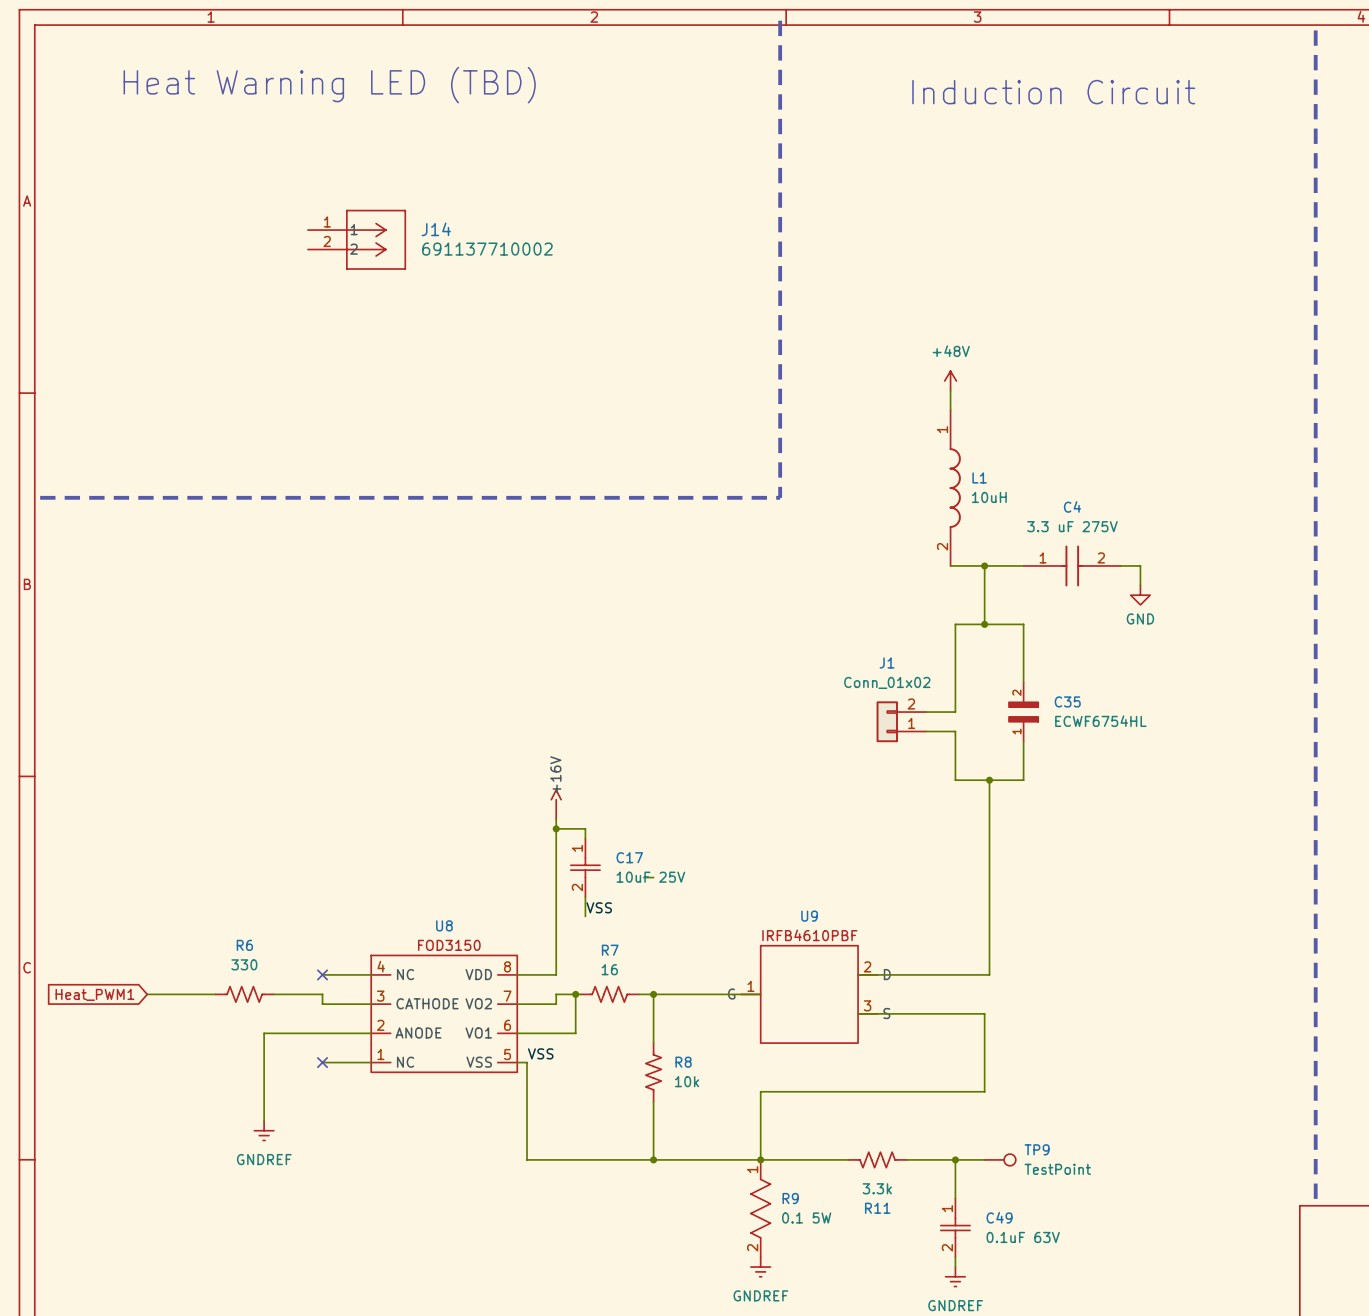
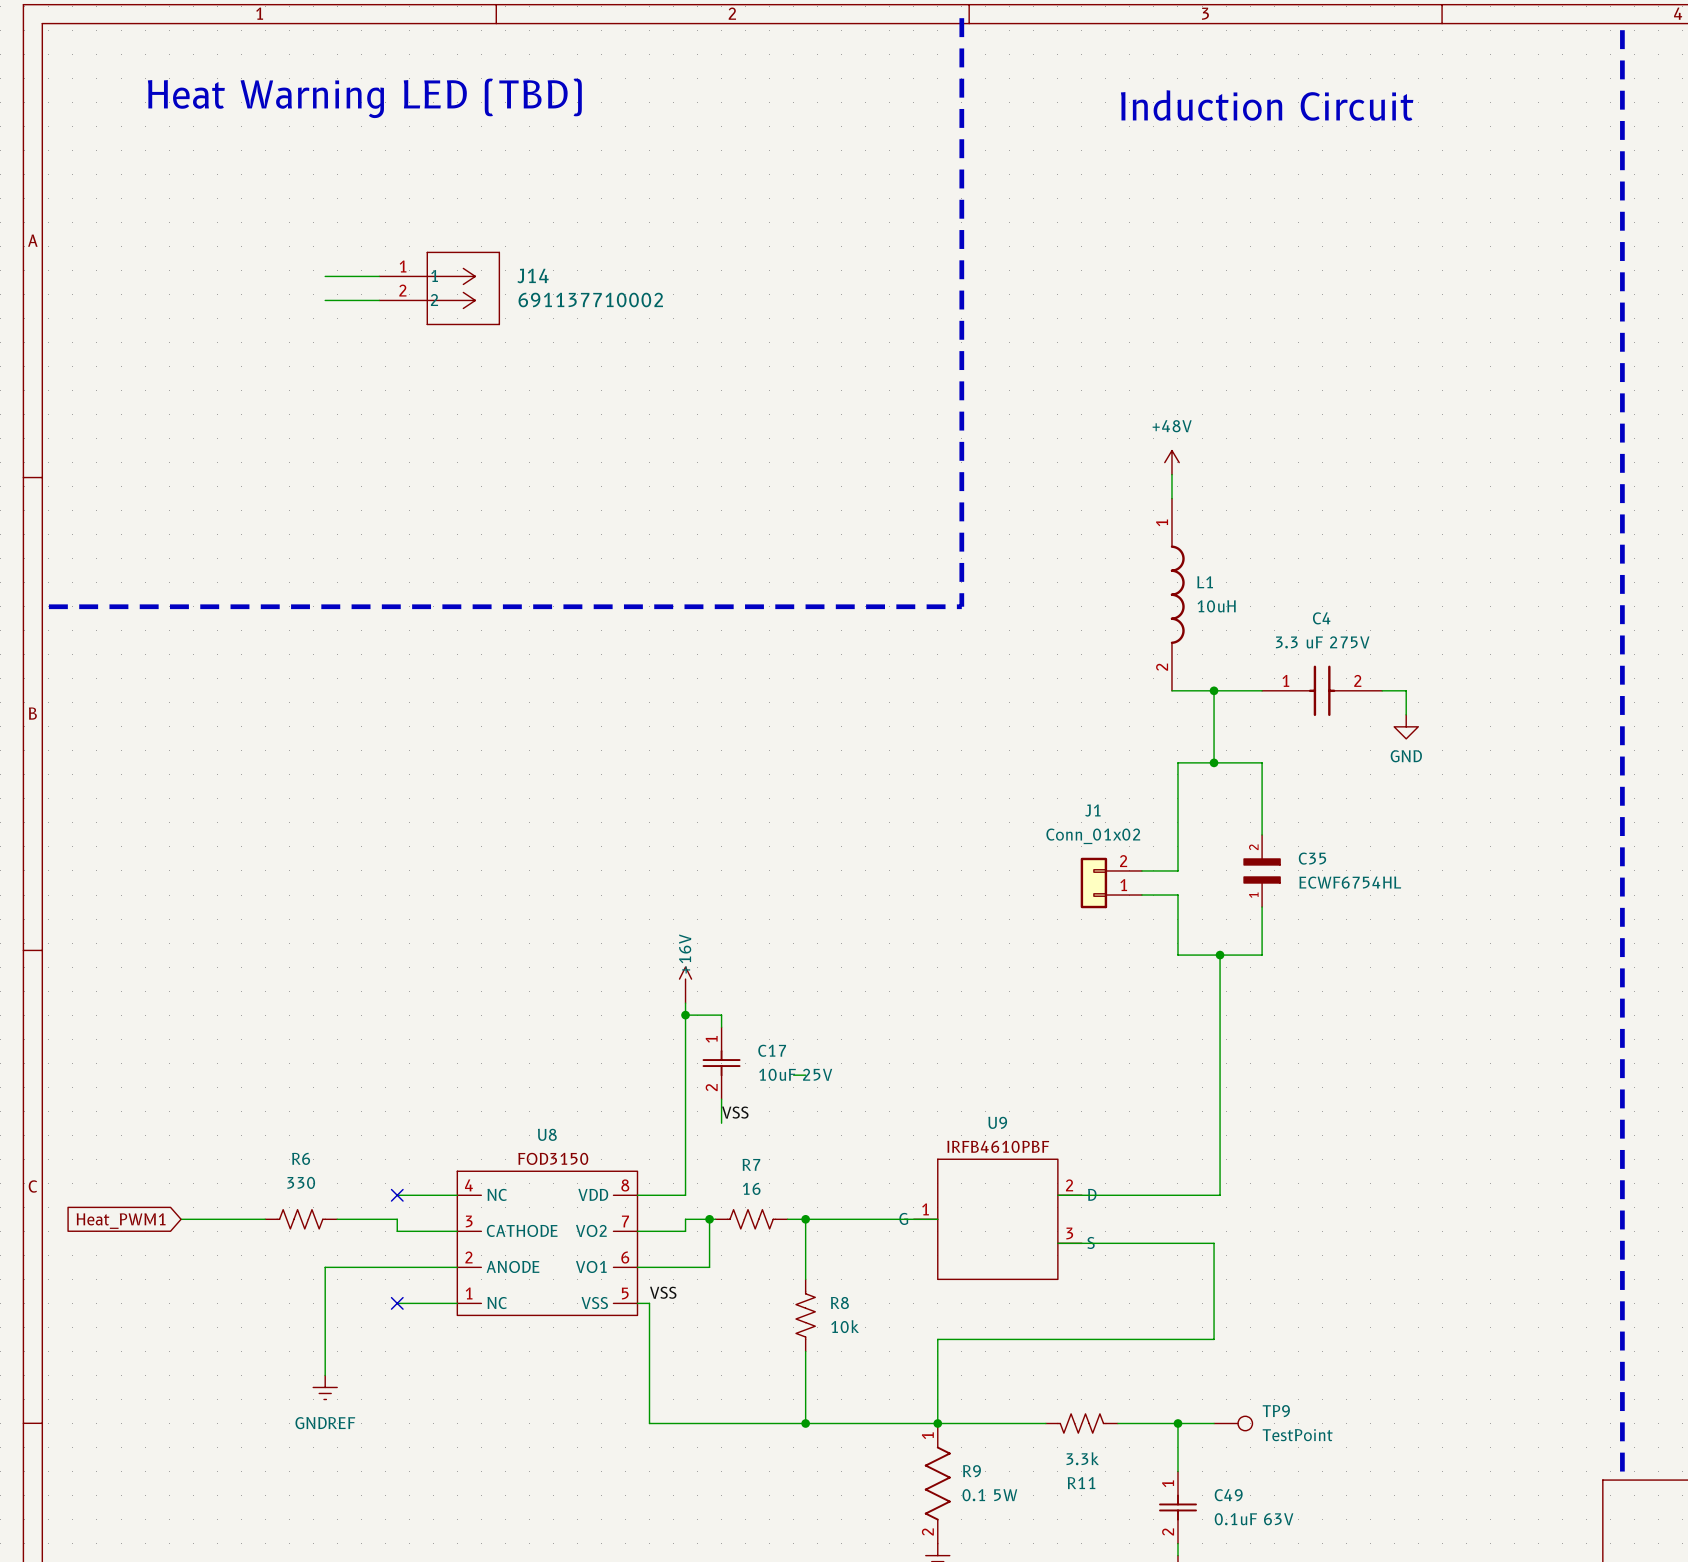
wire: none -> (325, 276) (379, 276)
wire: none -> (325, 300) (379, 300)

